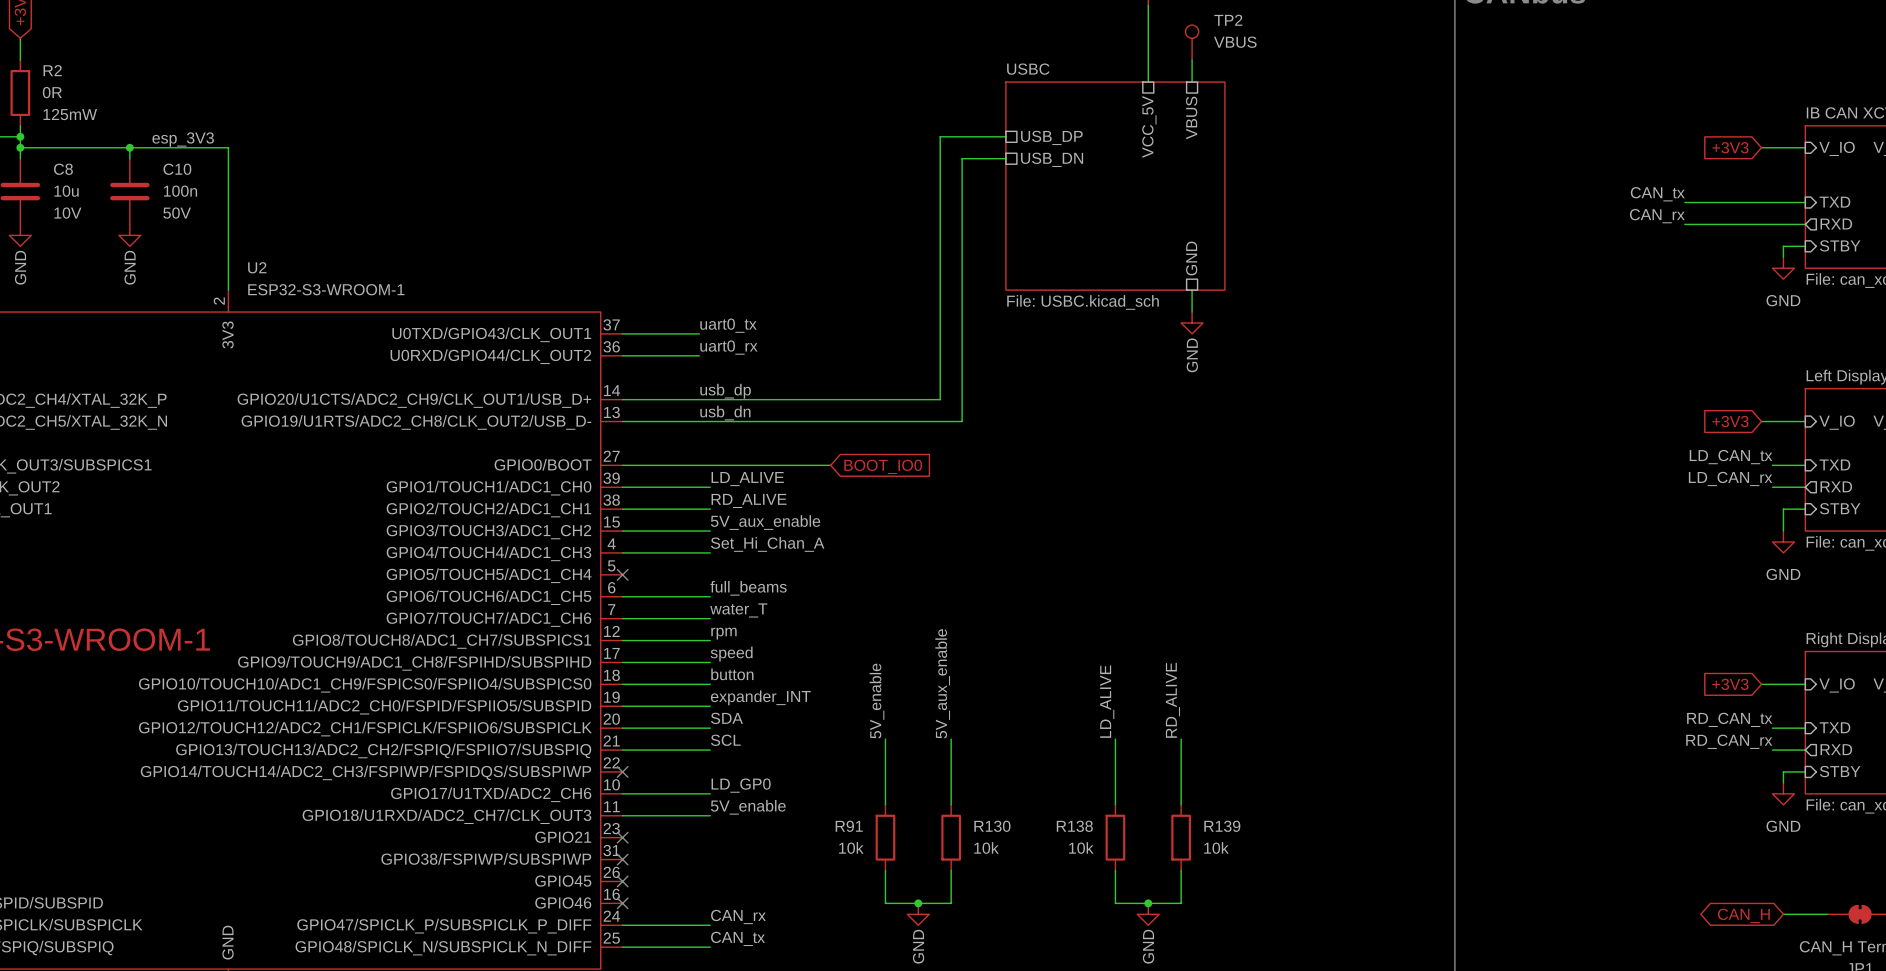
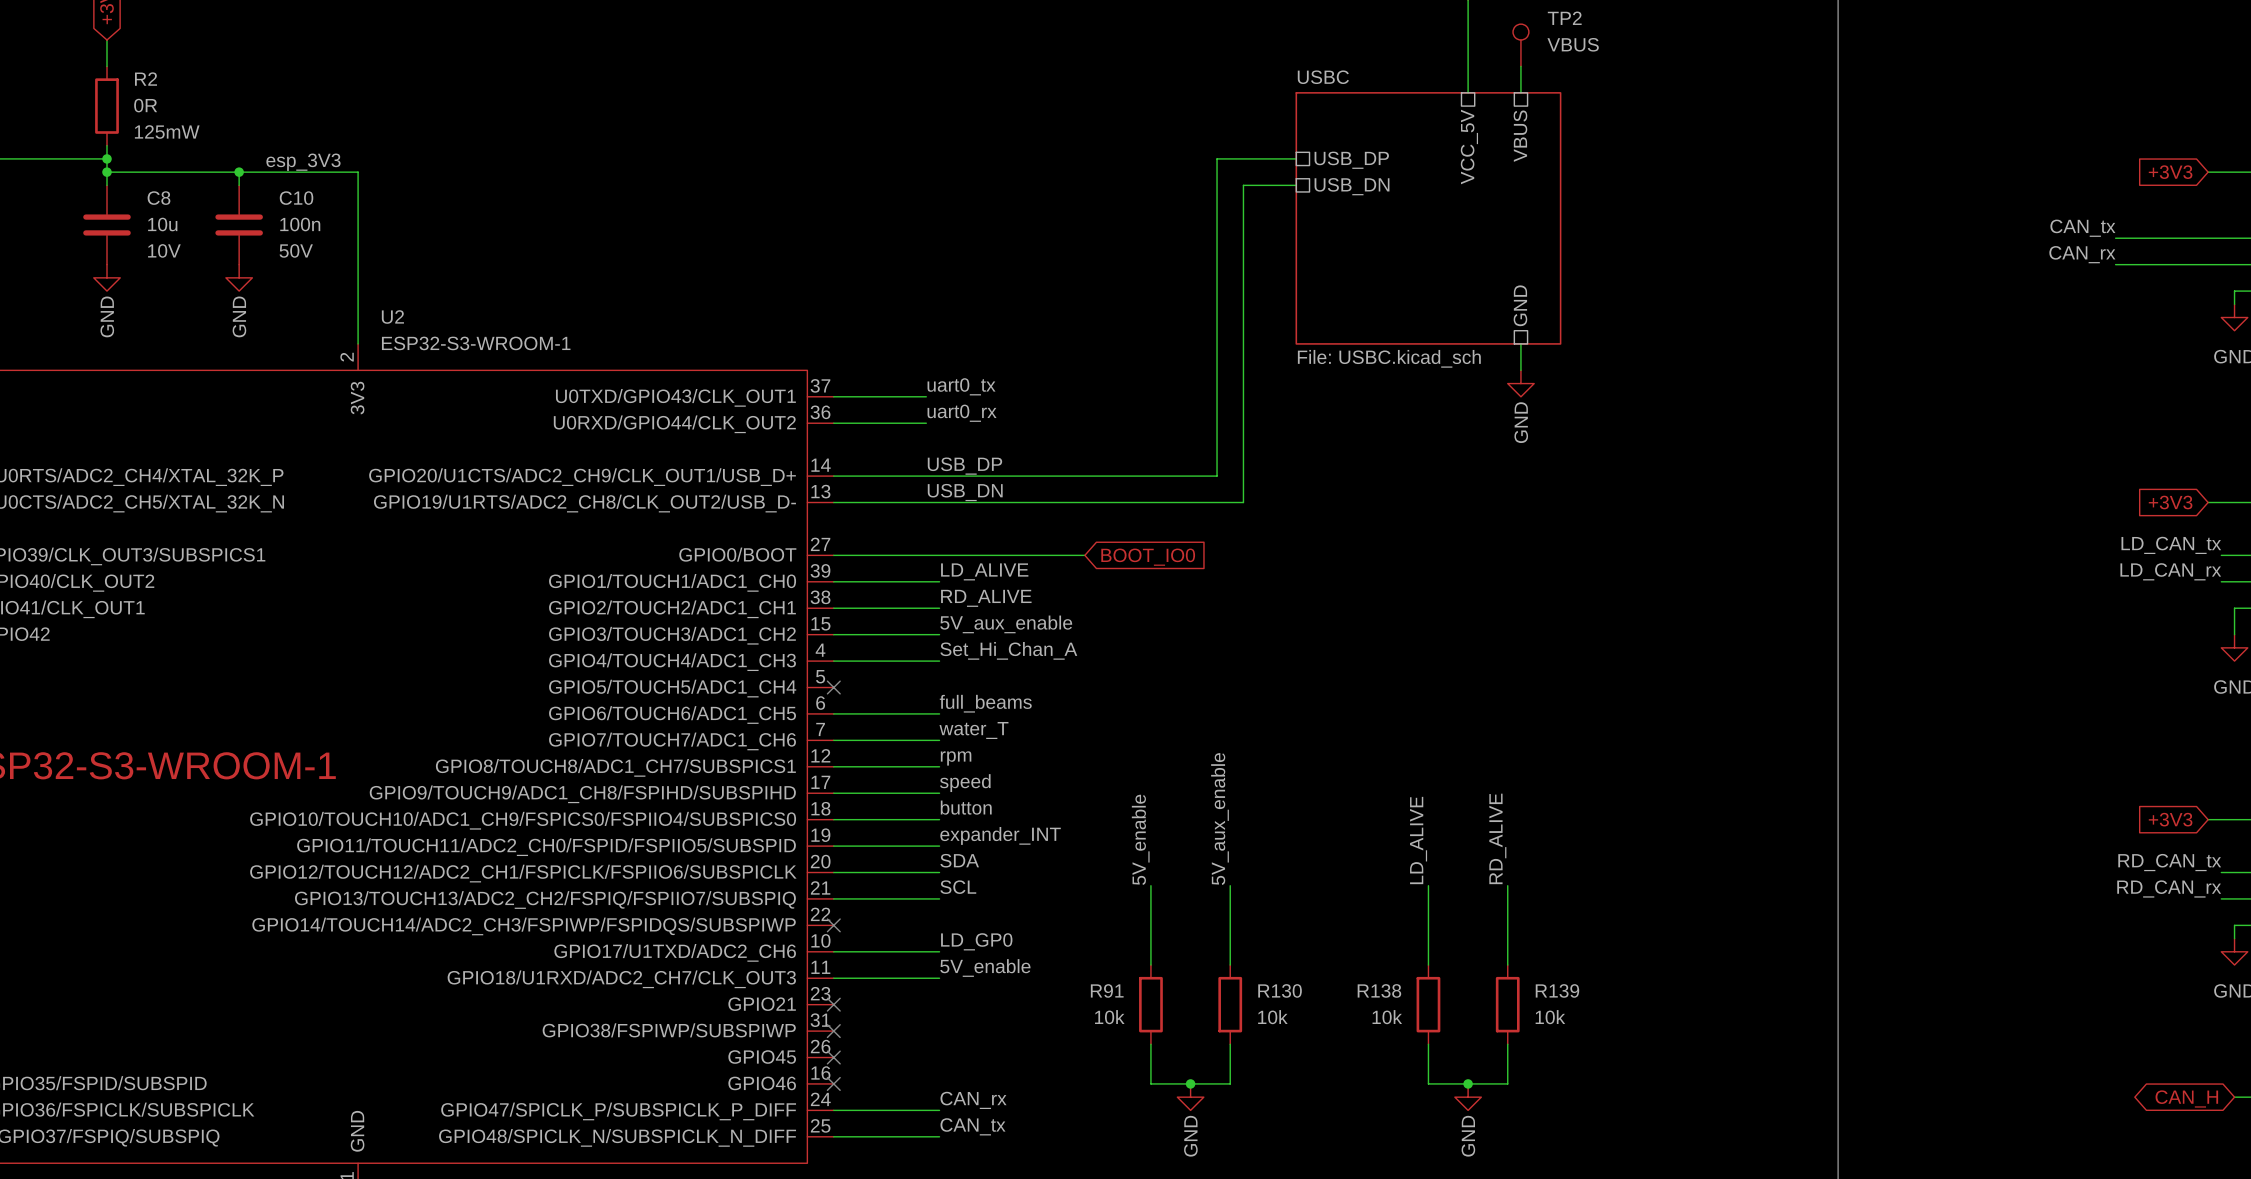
label: usb_dp (725, 391) -> USB_DP (964, 466)
label: usb_dn (725, 413) -> USB_DN (965, 492)

